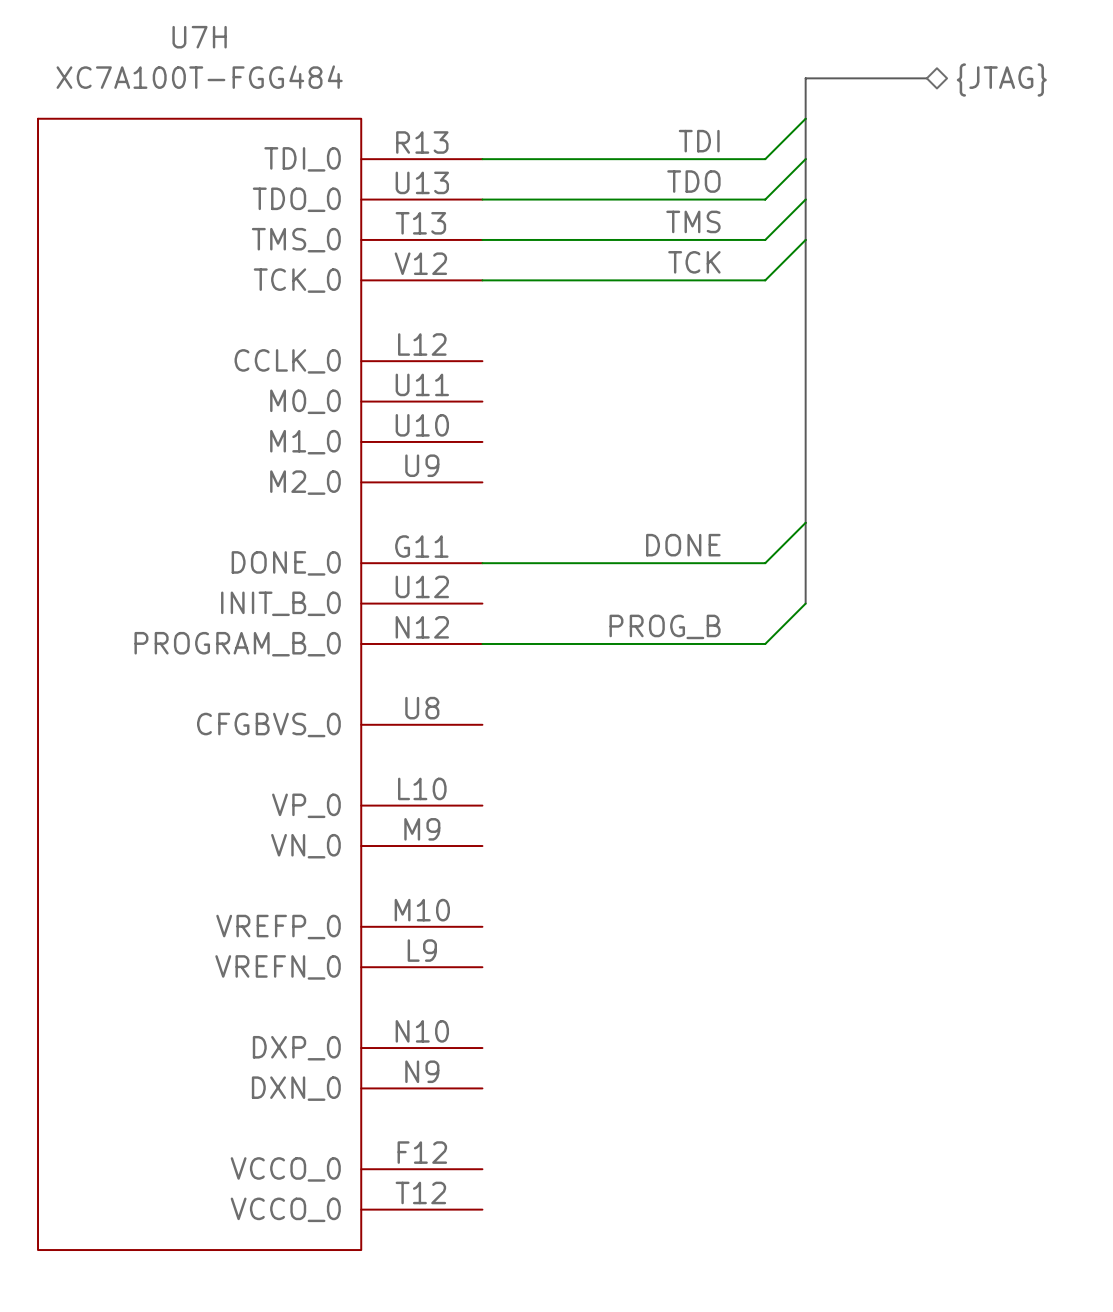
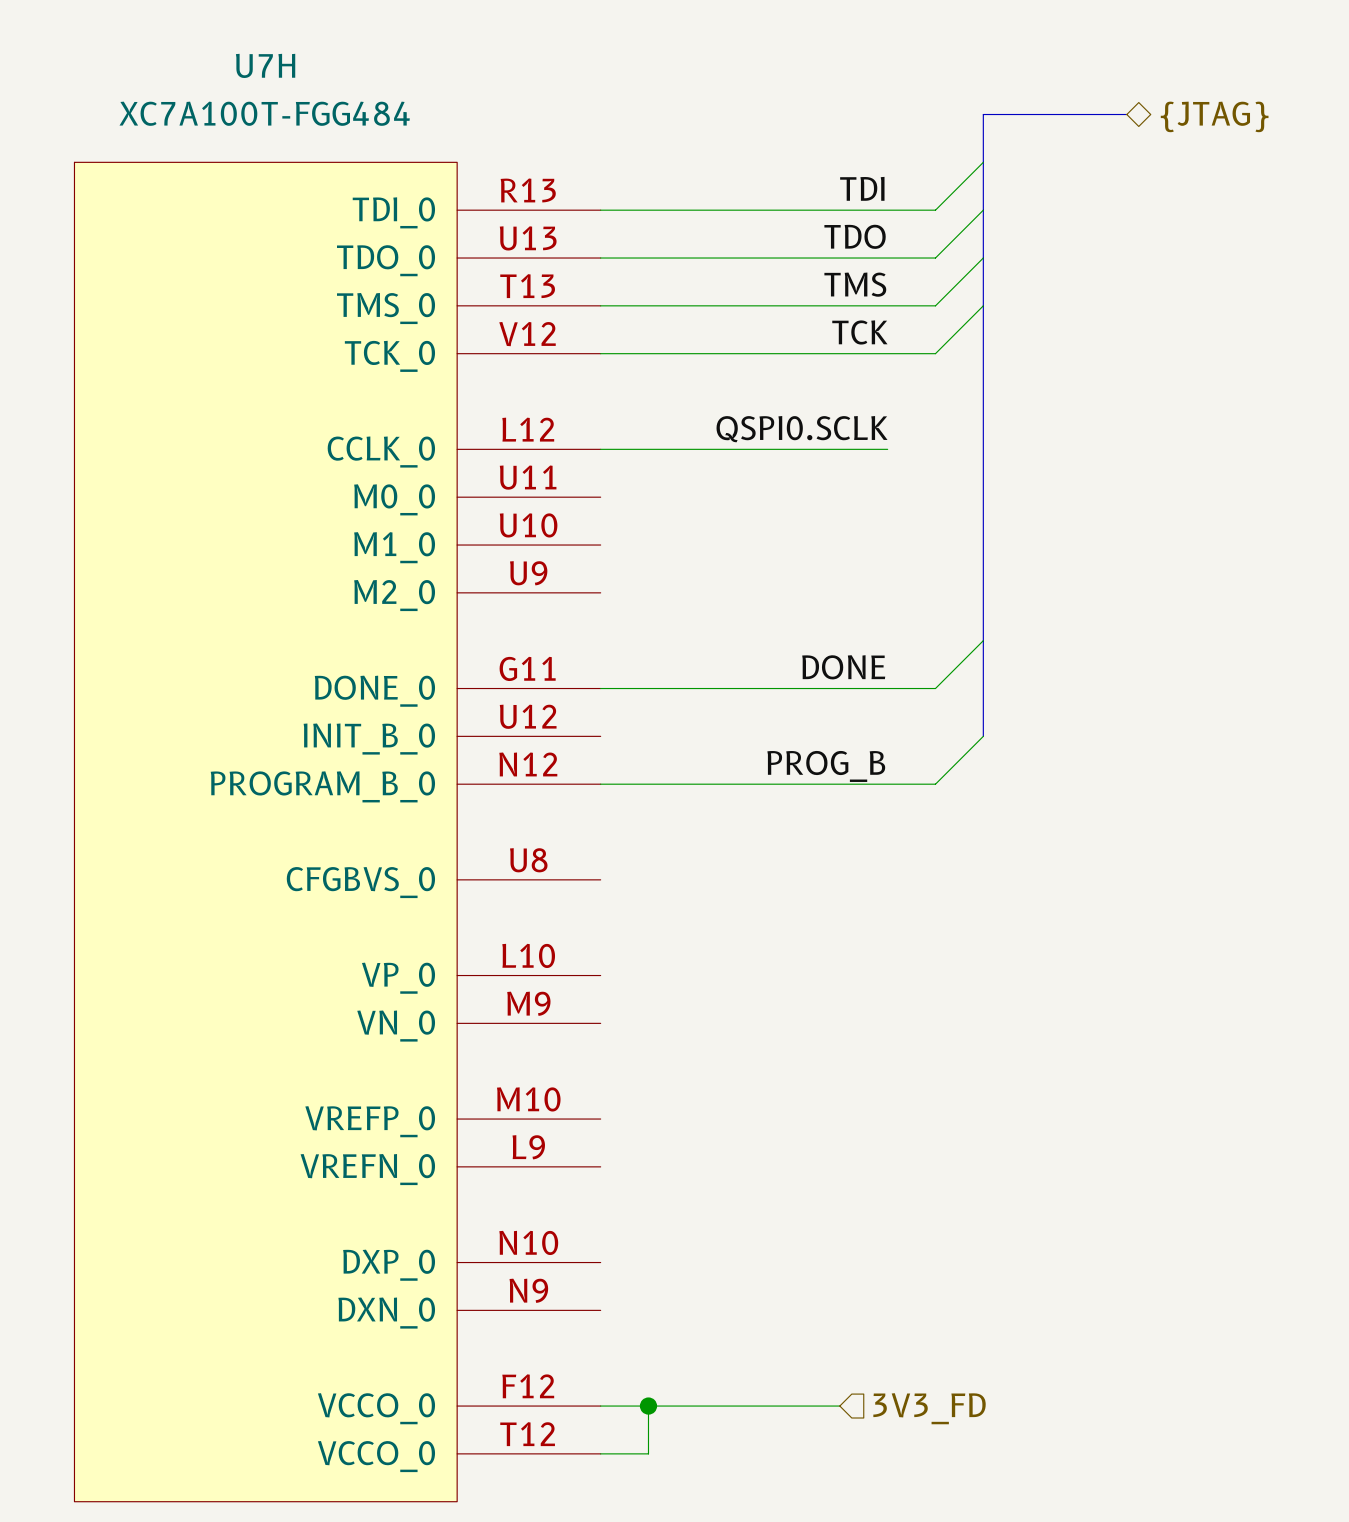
label: none -> QSPI0.SCLK (802, 429)
wire: none -> (600, 449) (887, 449)
wire: none -> (600, 1406) (839, 1406)
wire: none -> (648, 1406) (648, 1453) (600, 1453)
junction: none -> (648, 1406)
hierarchical label: none -> 3V3_FD (929, 1408)

